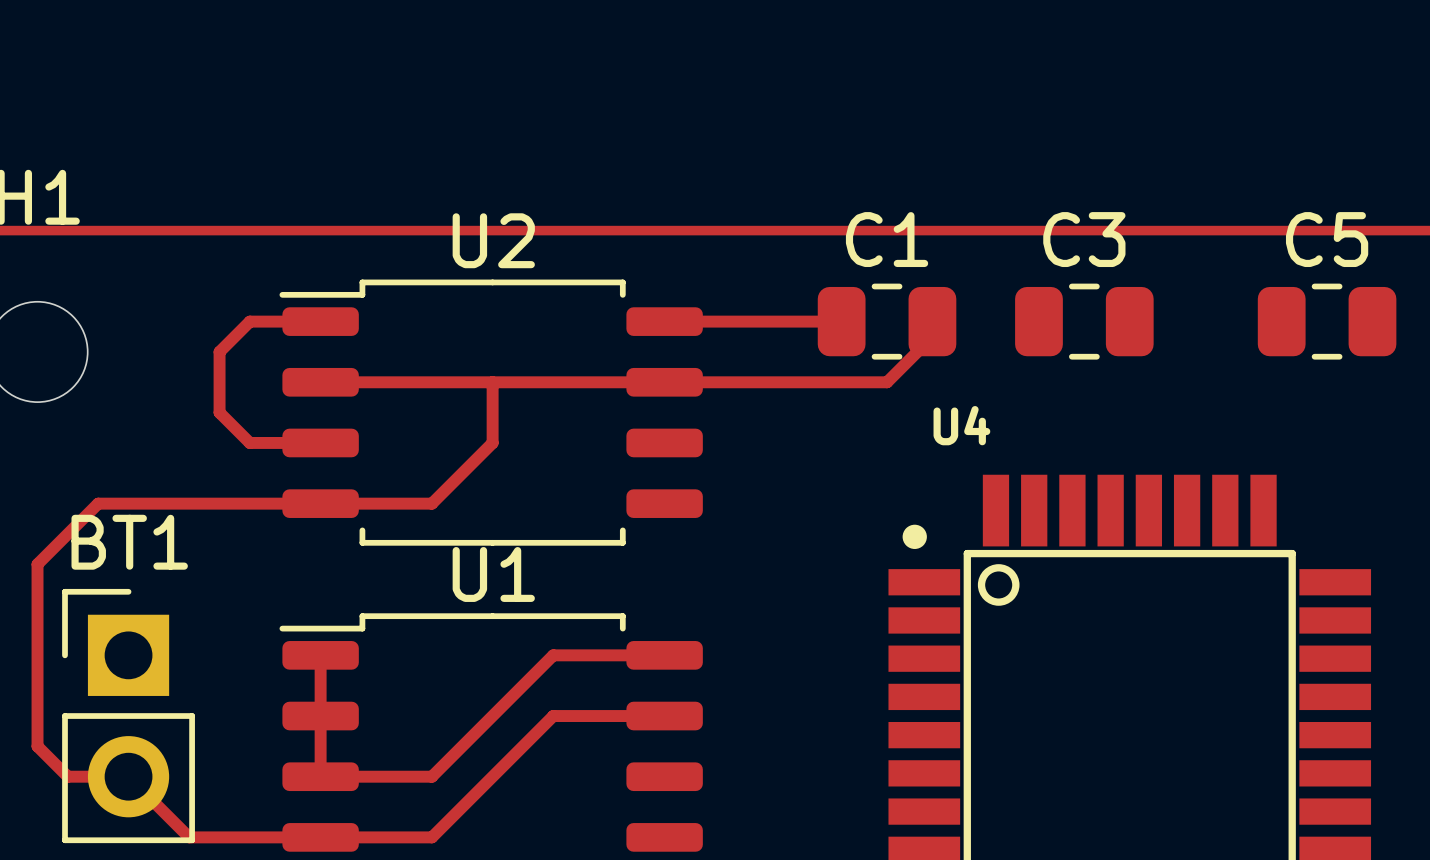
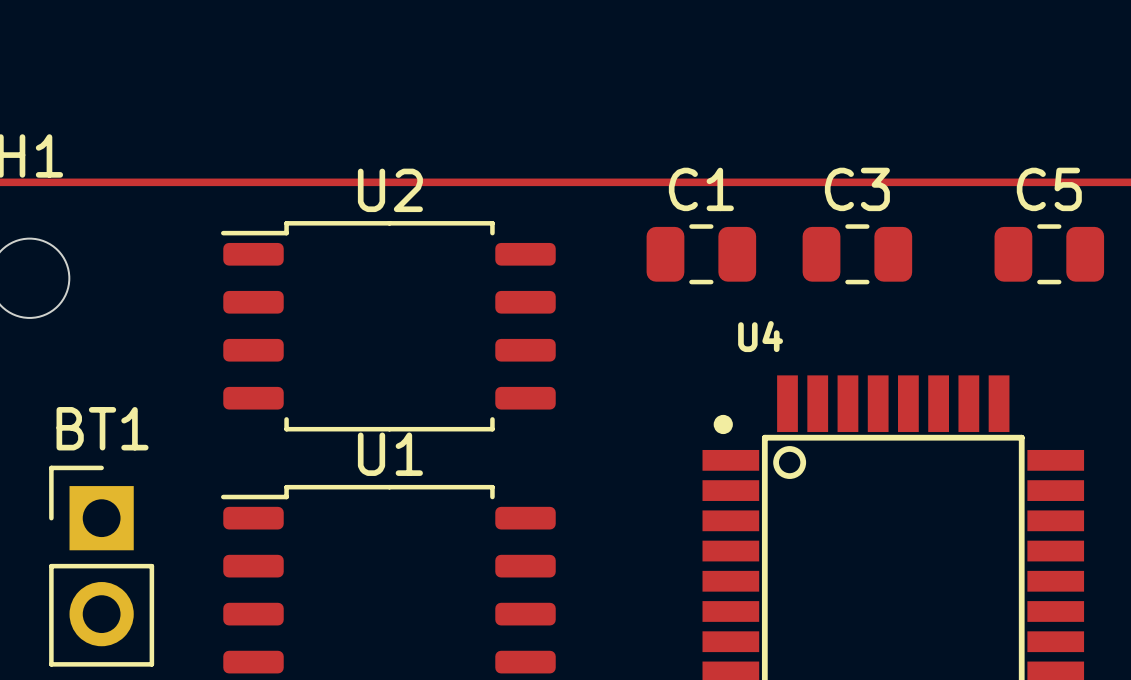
top track: (320, 321) (249, 321) (219, 351) (219, 412) (249, 442) (320, 442) -> none
top track: (664, 321) (841, 321) -> none
top track: (932, 321) (932, 336) (887, 382) (320, 382) -> none
top track: (492, 382) (492, 442) (431, 503) (98, 503) (37, 564) (37, 746) (67, 776) (128, 776) (189, 837) (431, 837) (553, 716) (664, 716) -> none
top track: (320, 655) (320, 776) (431, 776) (553, 655) (664, 655) -> none

